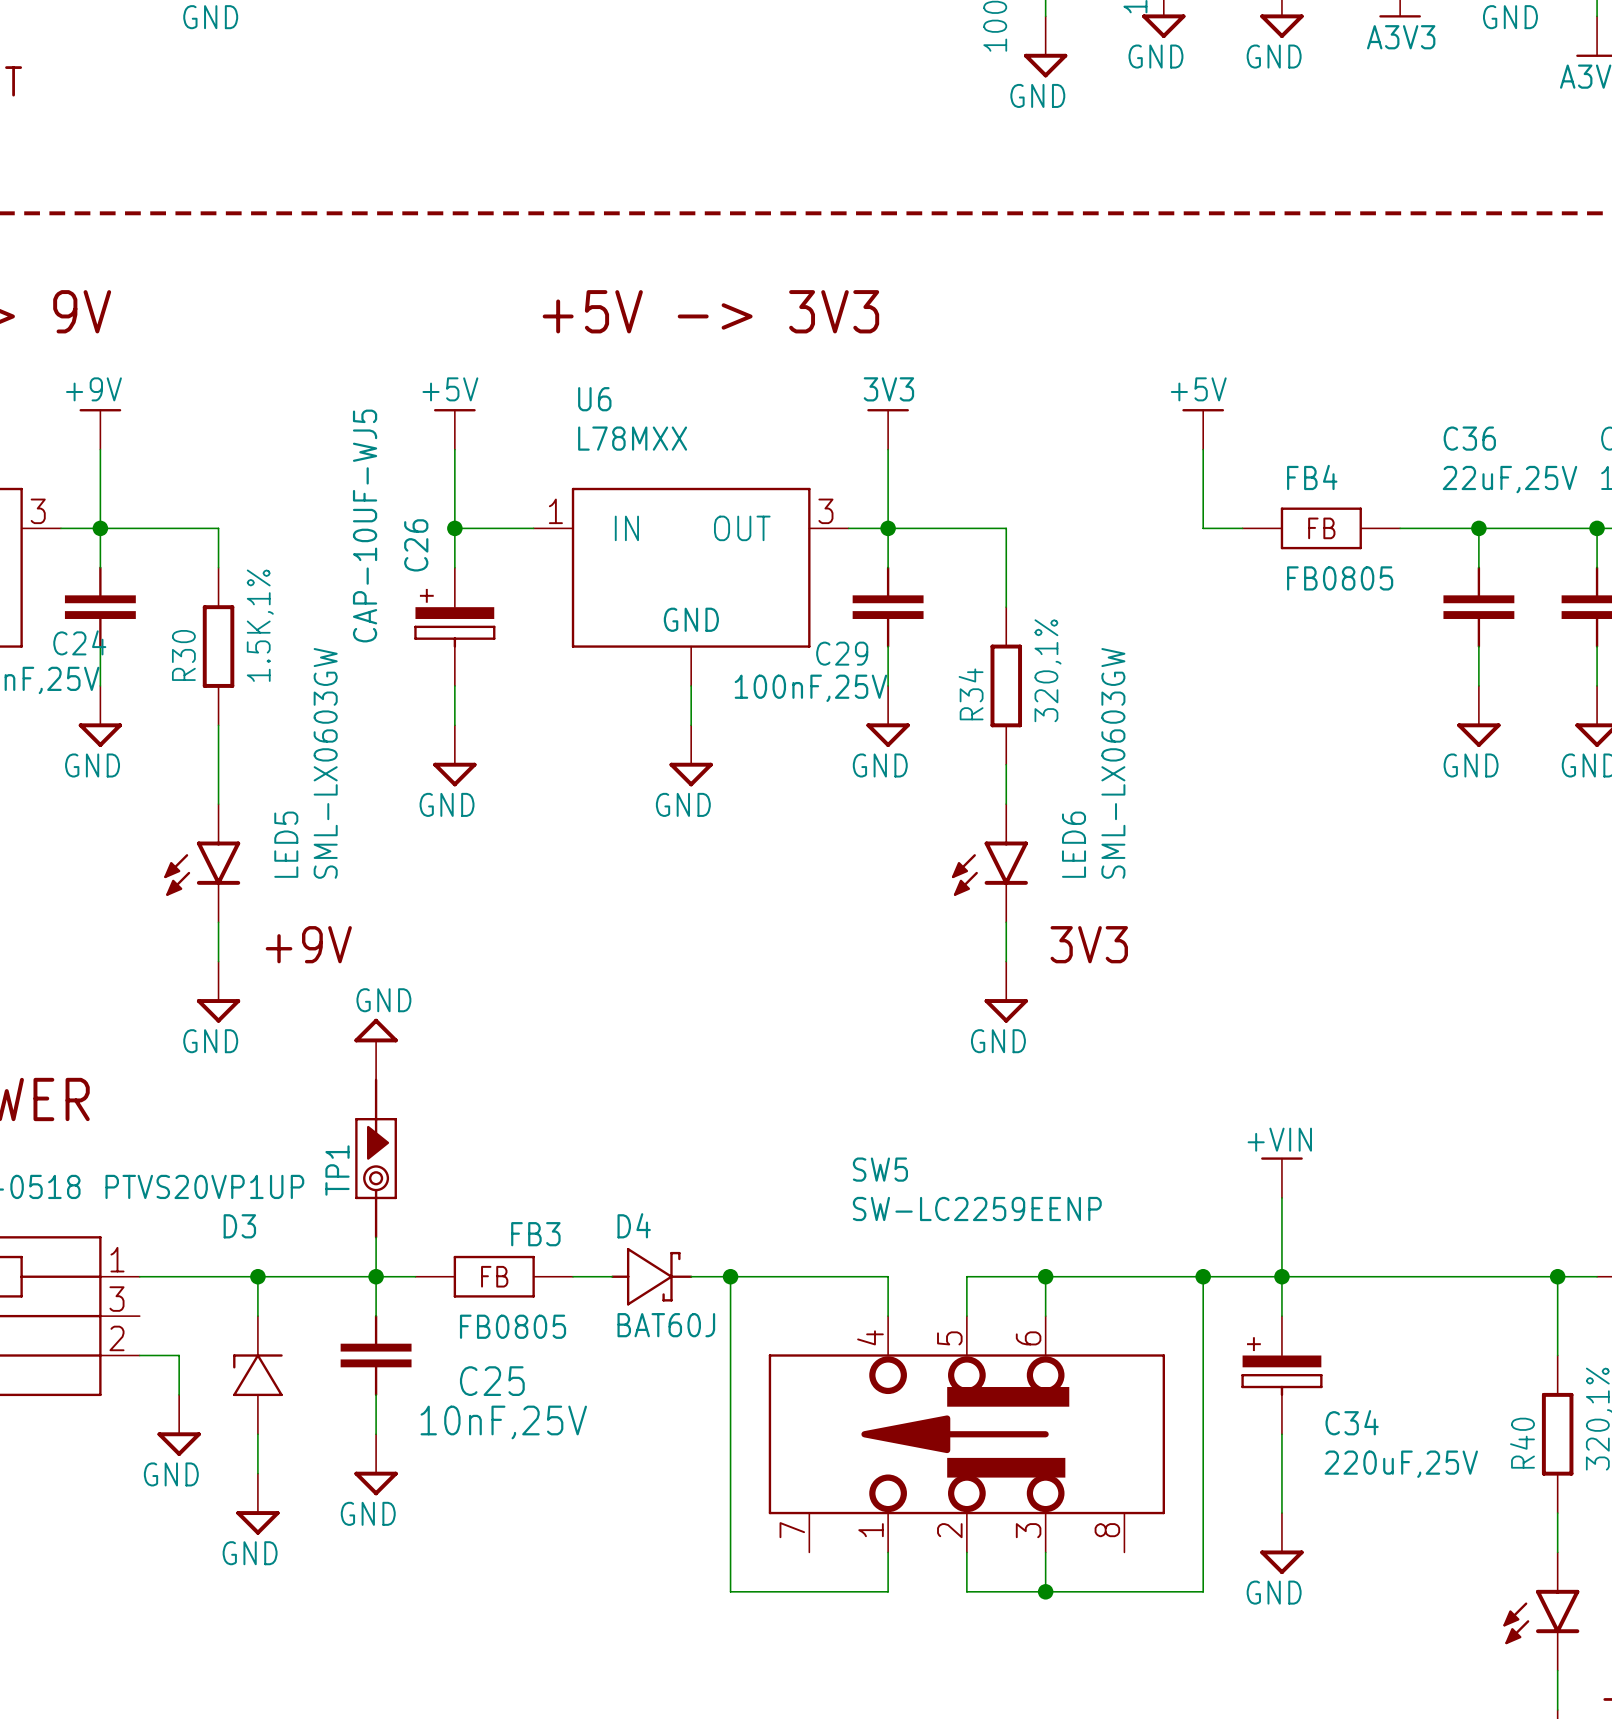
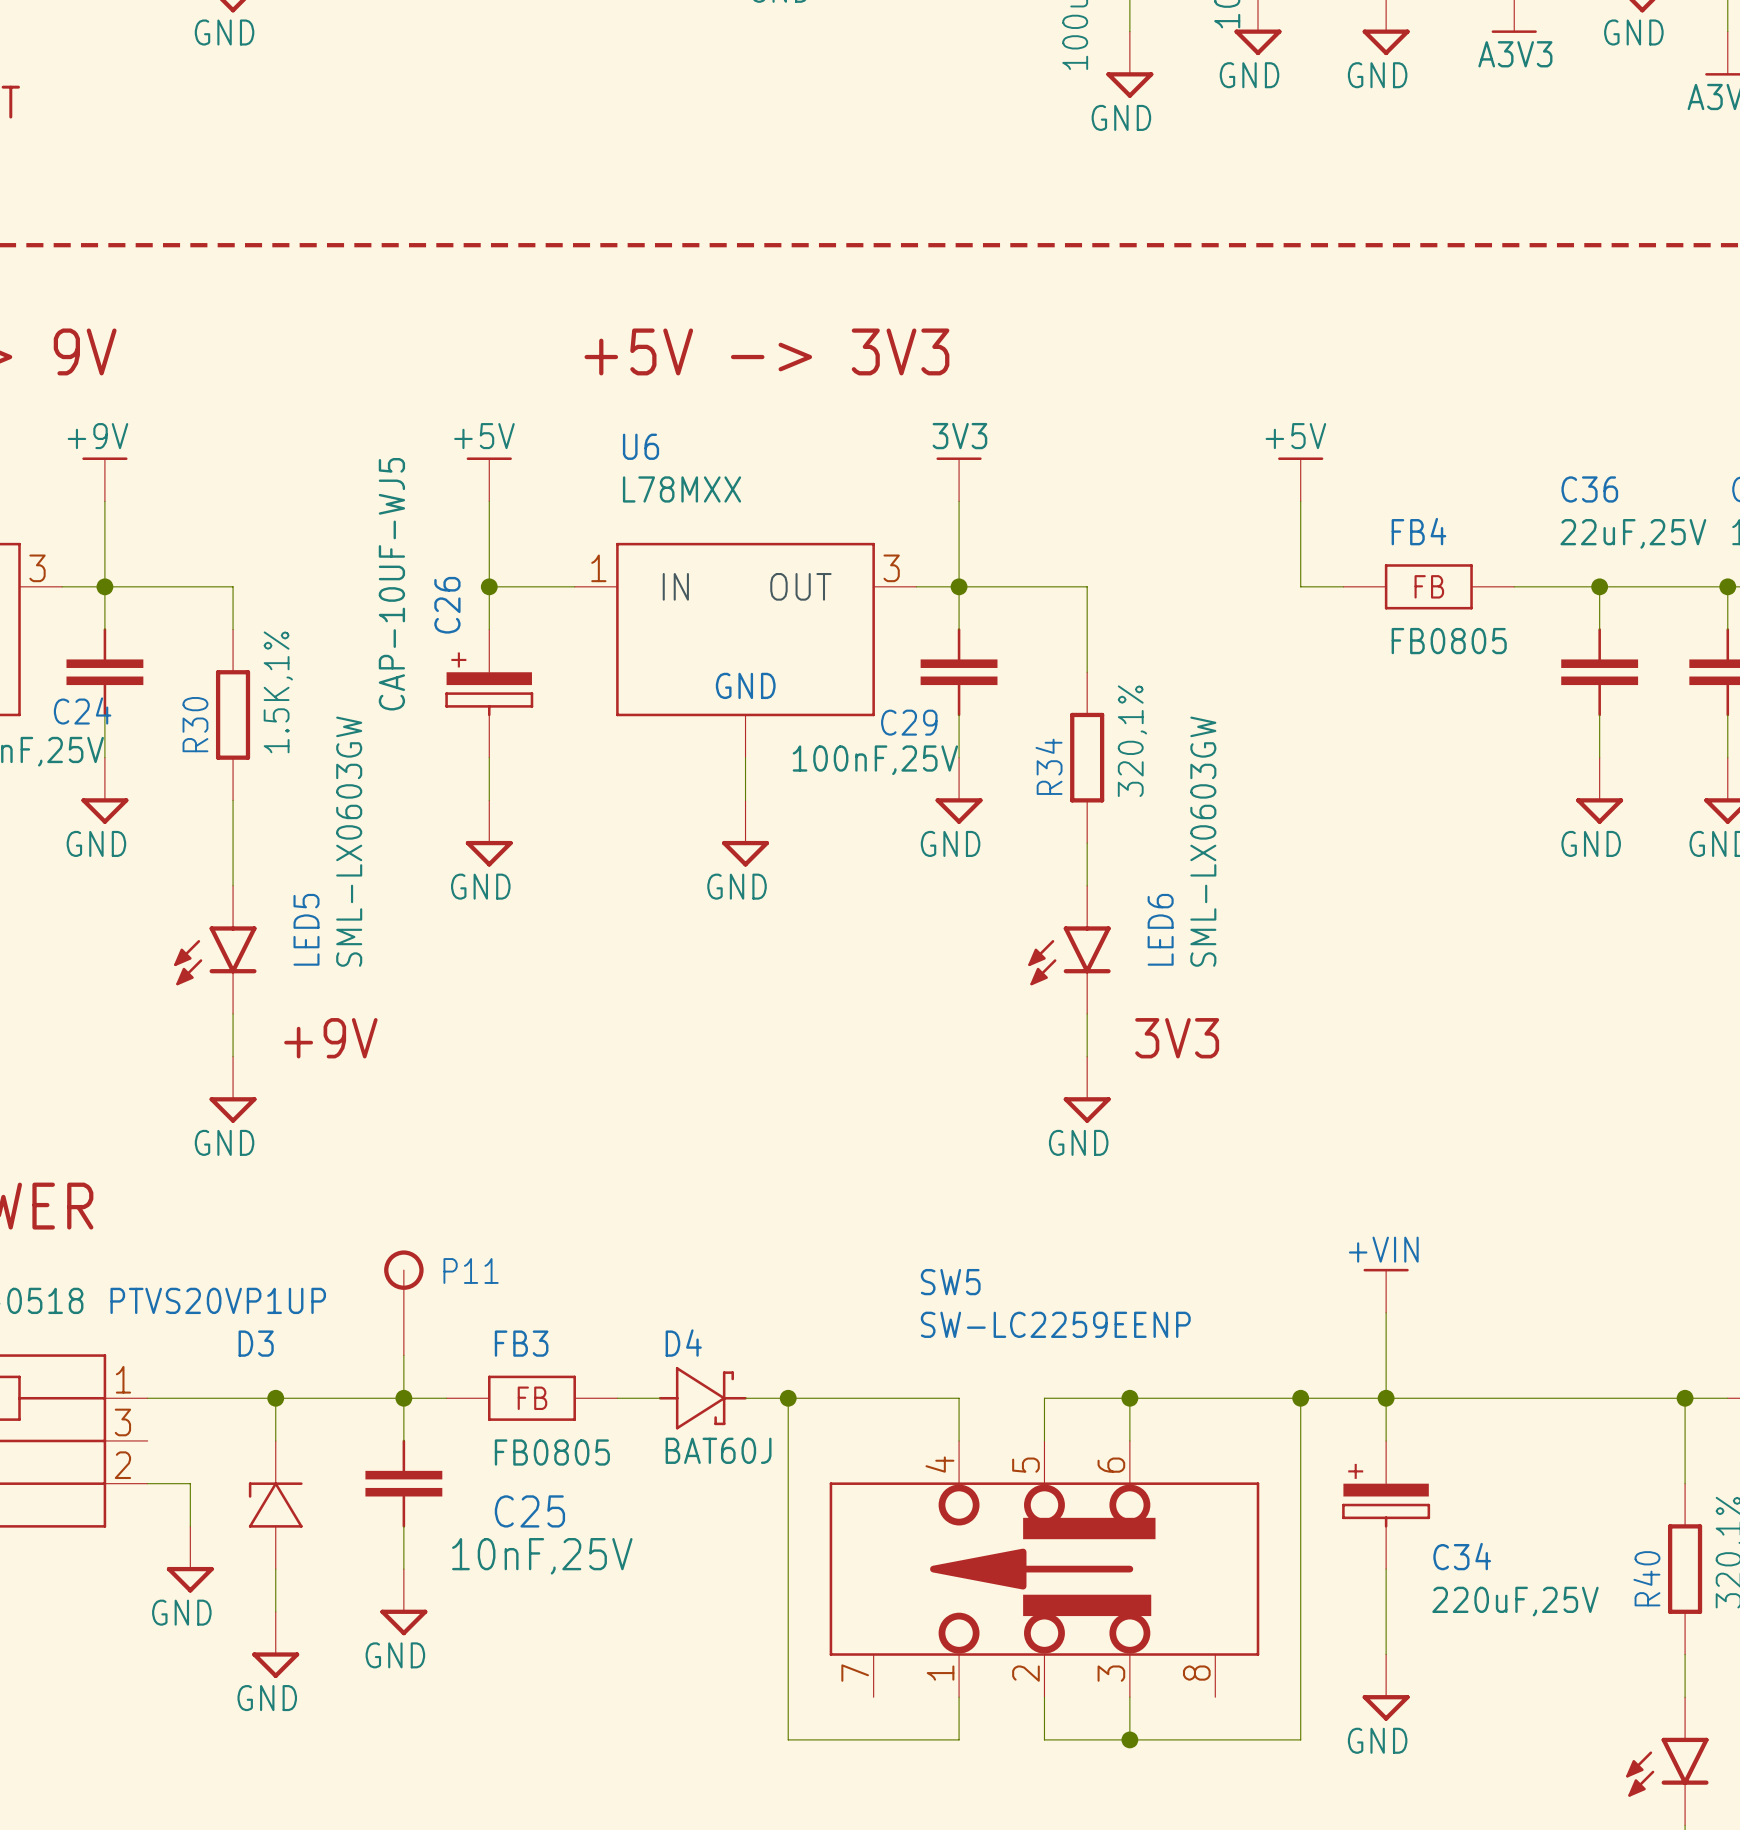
power symbol: GND (376, 1049) -> none
TP1: (376, 1158) -> none
P11: none -> (403, 1302)
FB3 name position: FB3 (535, 1234) -> FB3 (521, 1343)

